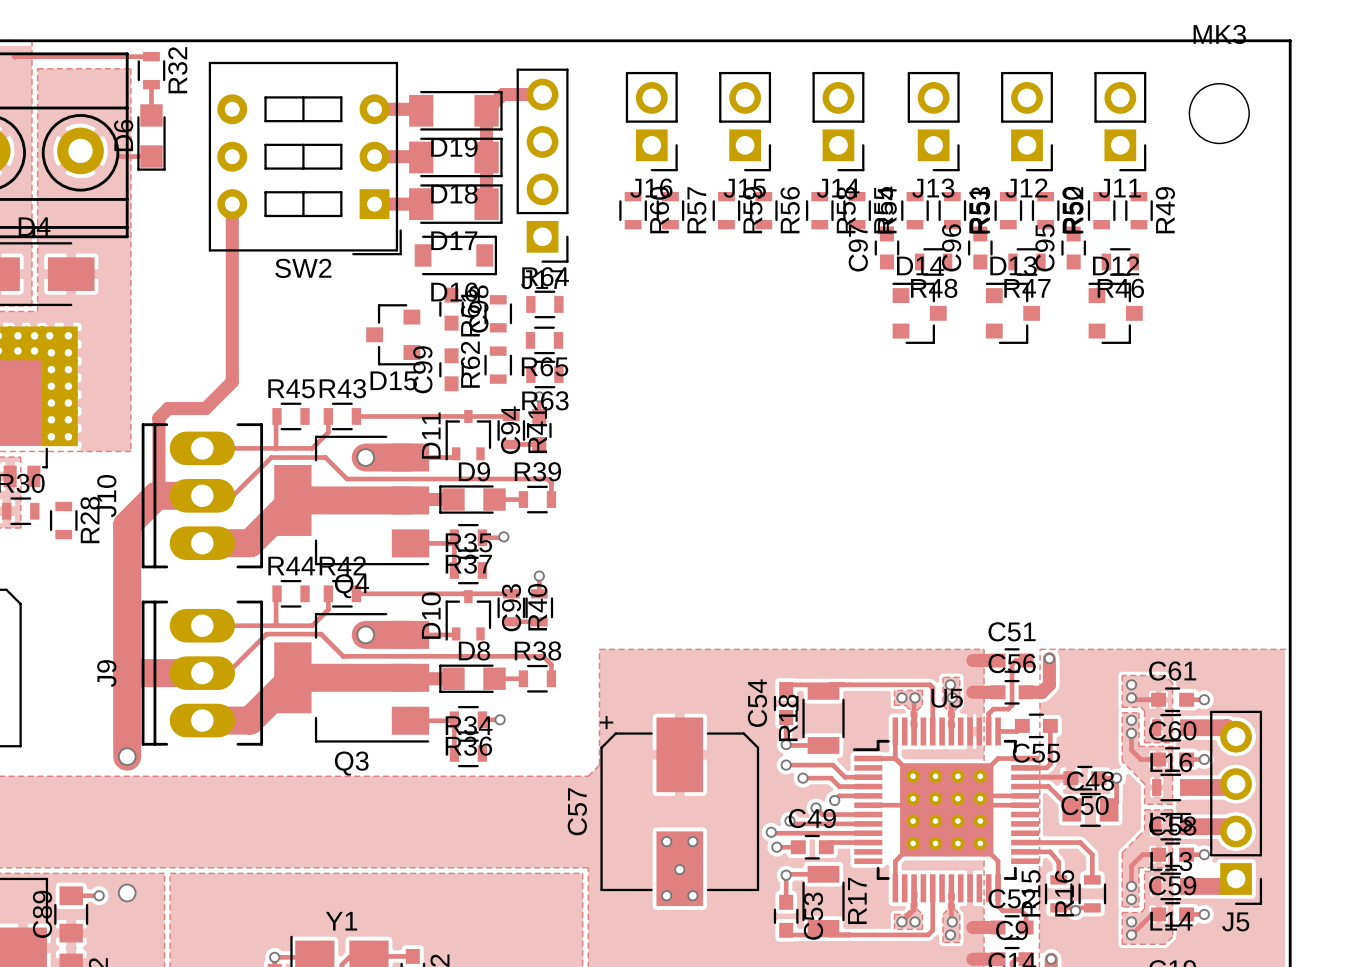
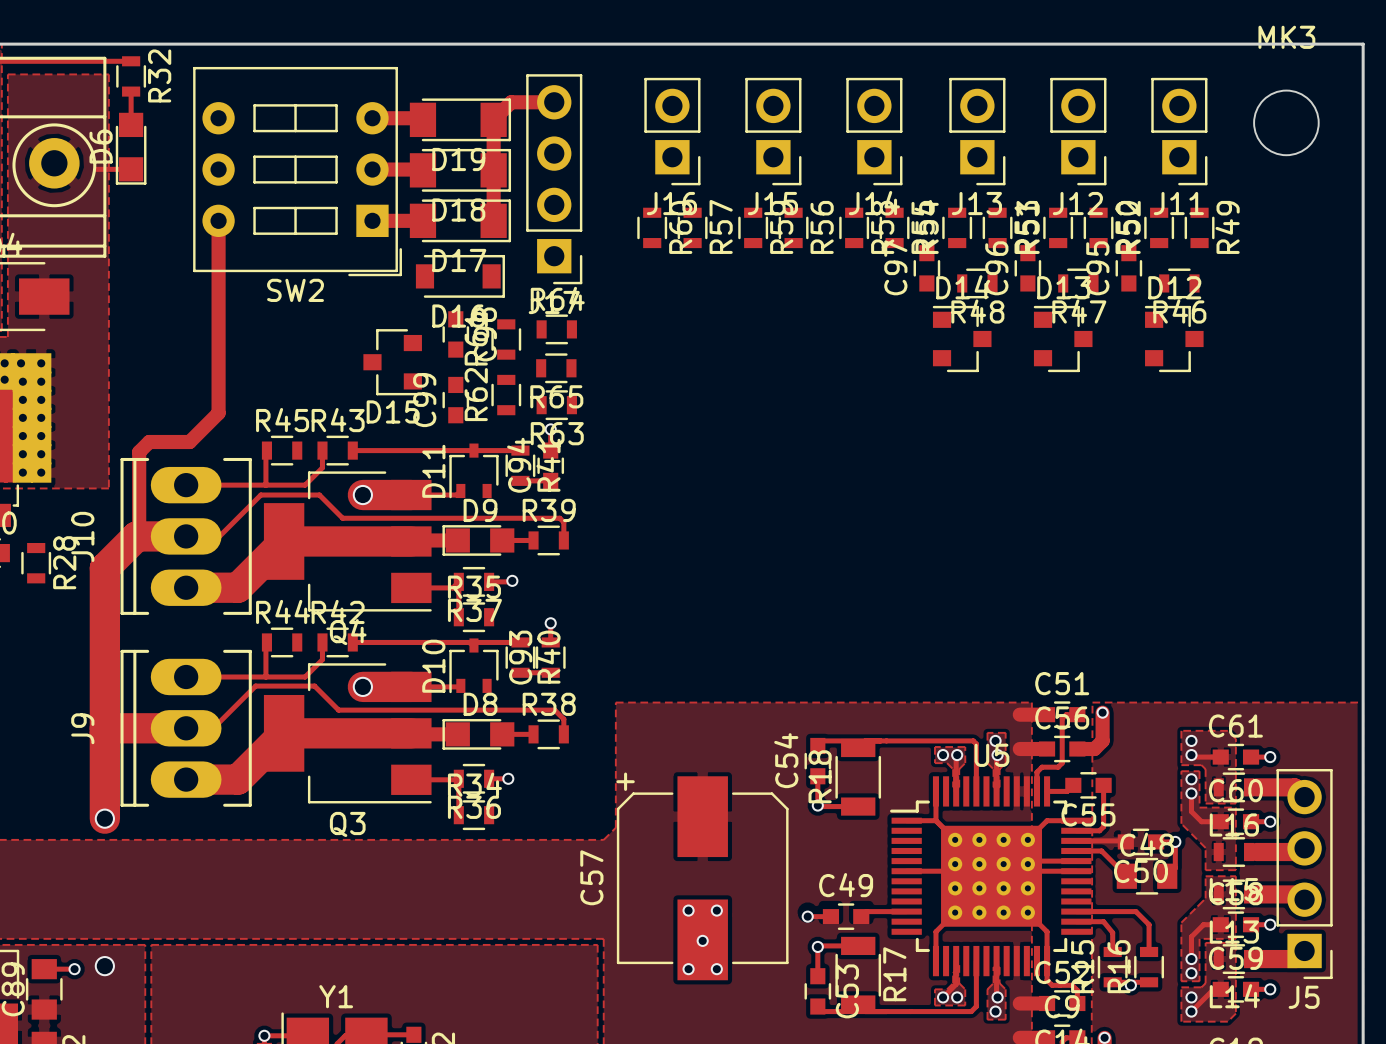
track: (786, 765) (832, 765) (844, 777) (868, 777) -> none
via: (786, 765) -> none
track: (802, 778) (830, 778) (839, 786) (868, 786) -> none
via: (802, 778) -> none
track: (868, 795) (839, 795) (834, 800) -> none
via: (834, 800) -> none
track: (816, 808) (822, 814) (868, 814) -> none
via: (816, 808) -> none
track: (789, 821) (792, 823) (868, 823) -> none
via: (789, 821) -> none
track: (771, 832) (868, 833) -> none
via: (771, 832) -> none

